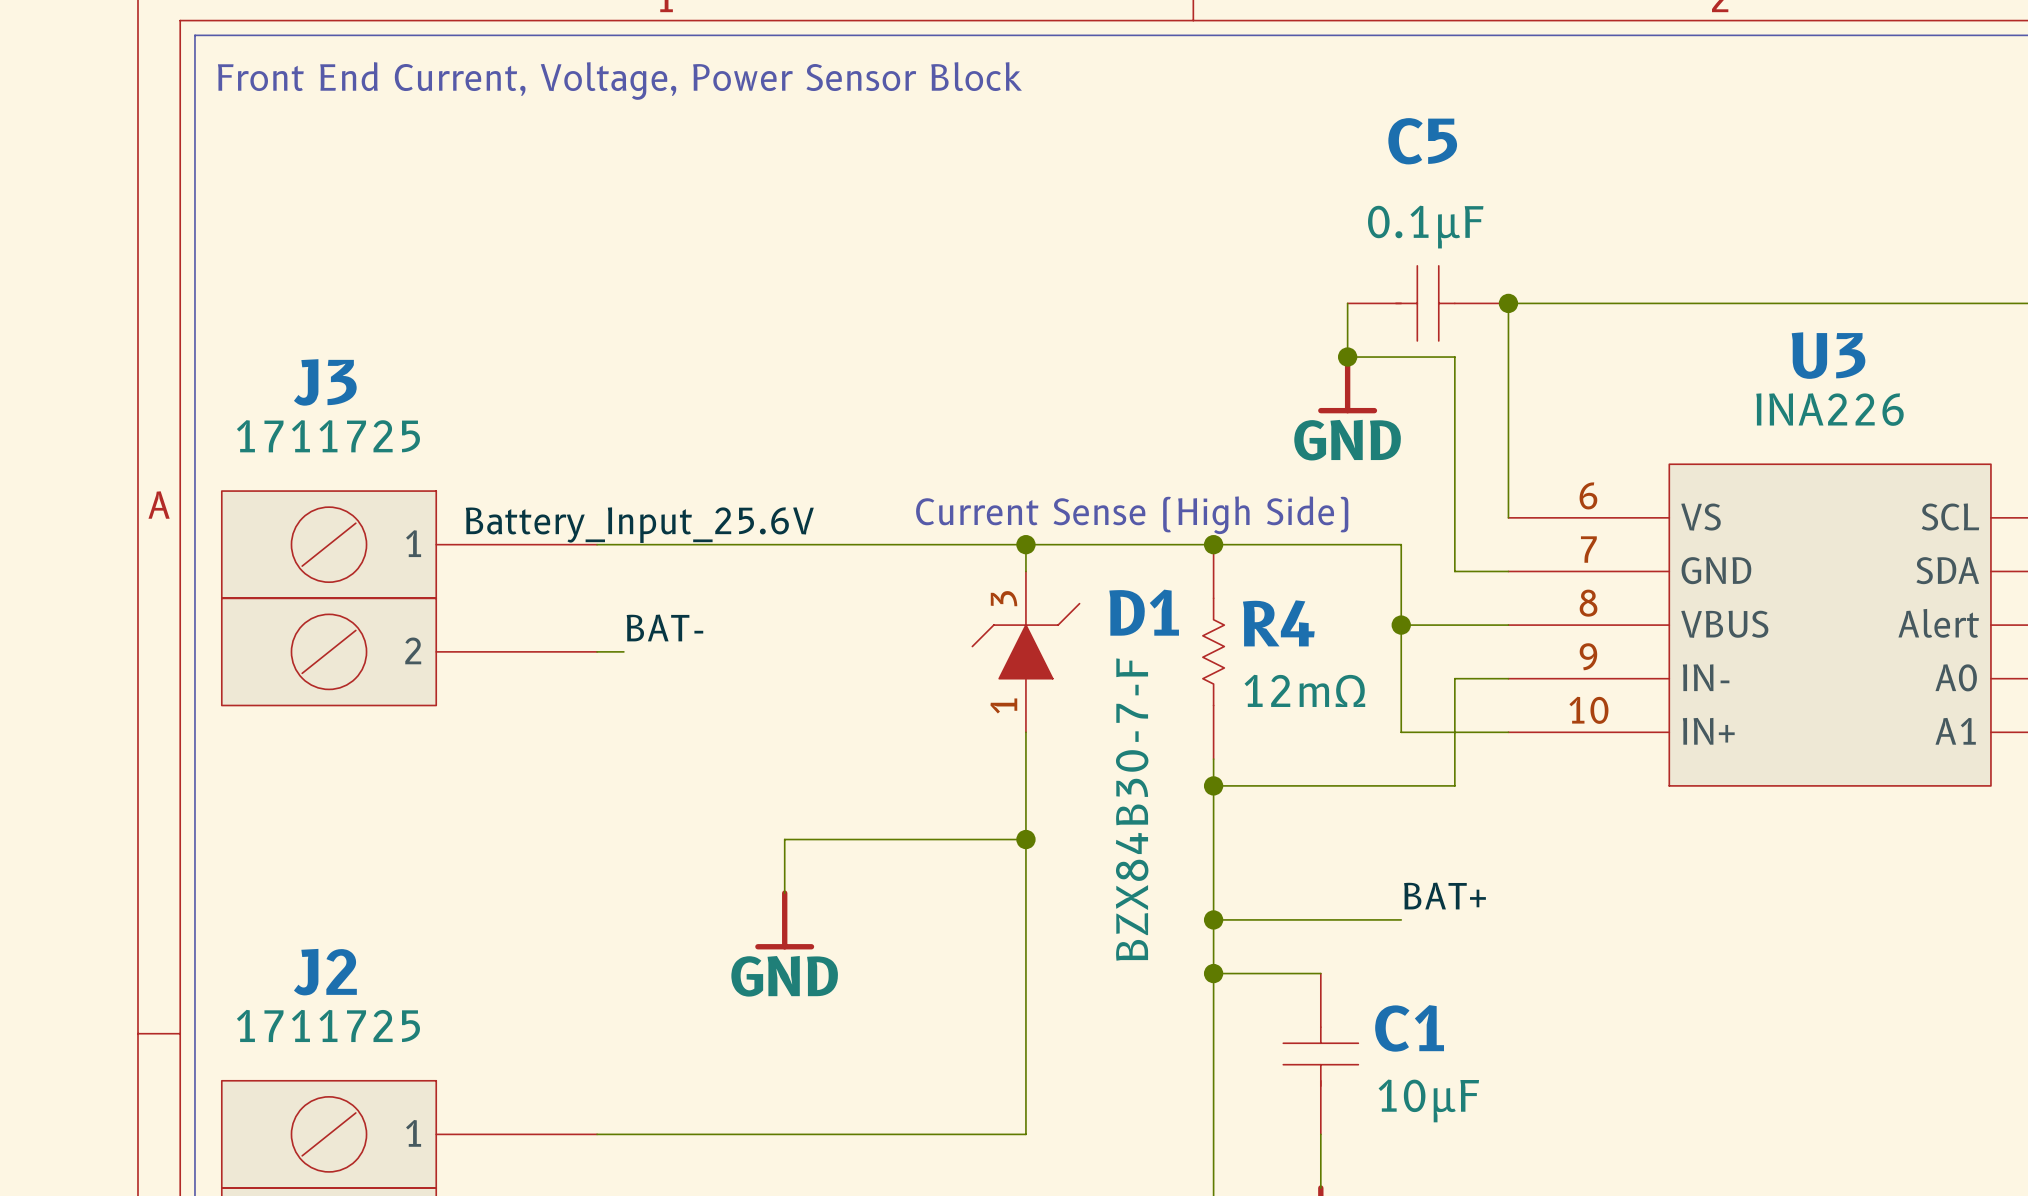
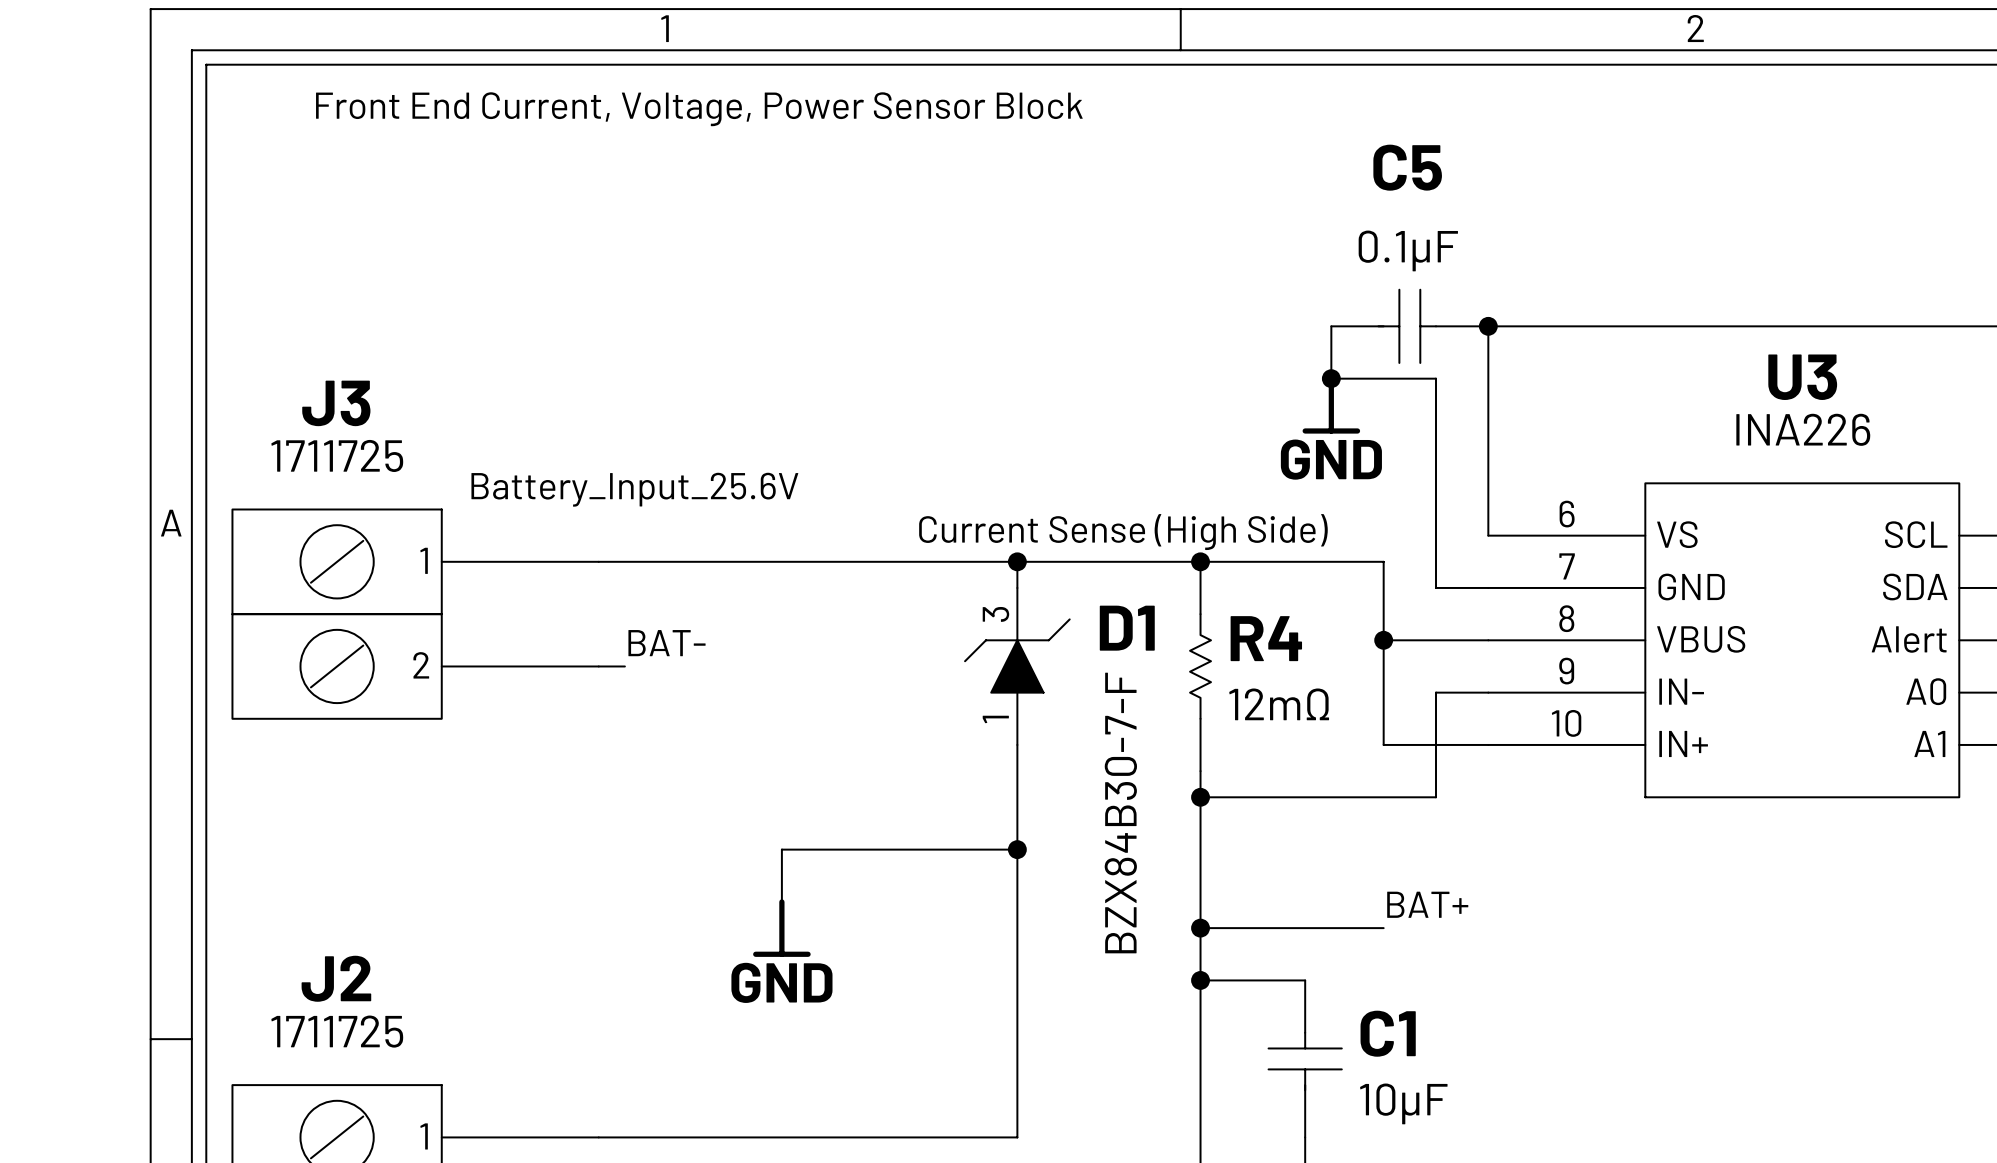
text position: Front End Current, Voltage, Power Sensor Block (619, 81) -> Front End Current, Voltage, Power Sensor Block (699, 109)
label position: Battery_Input_25.6V (639, 525) -> Battery_Input_25.6V (634, 489)

